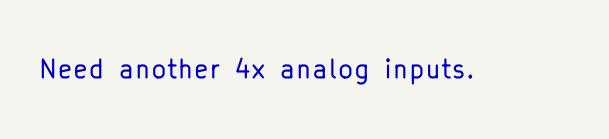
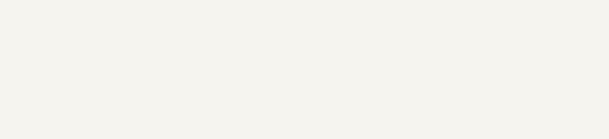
text: Need another 4x analog inputs. (256, 71) -> none

